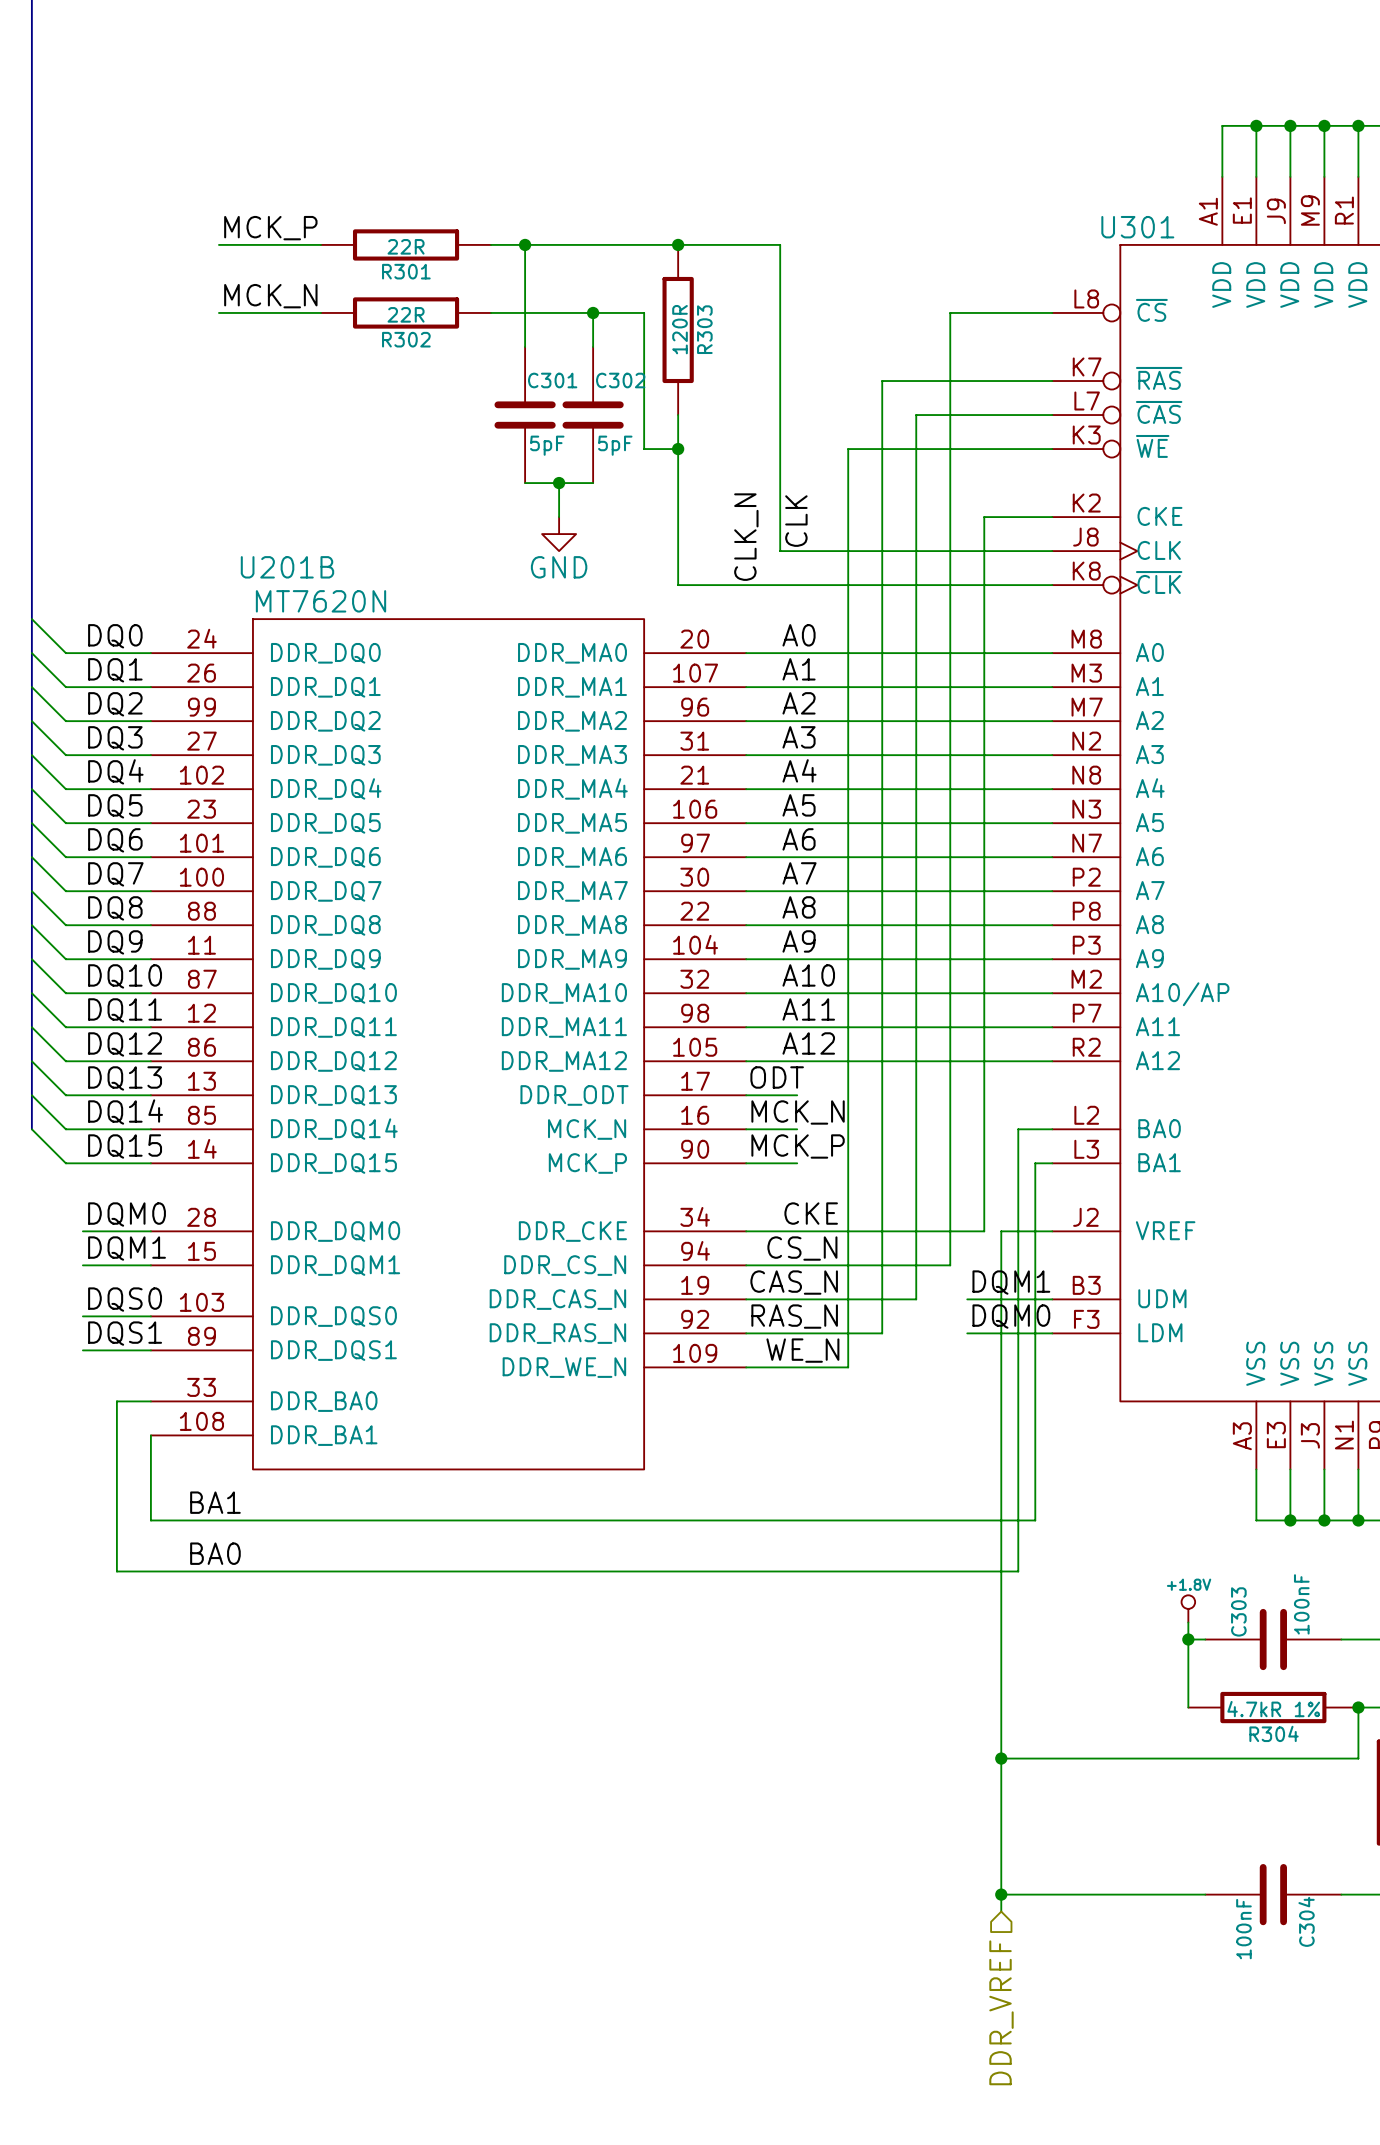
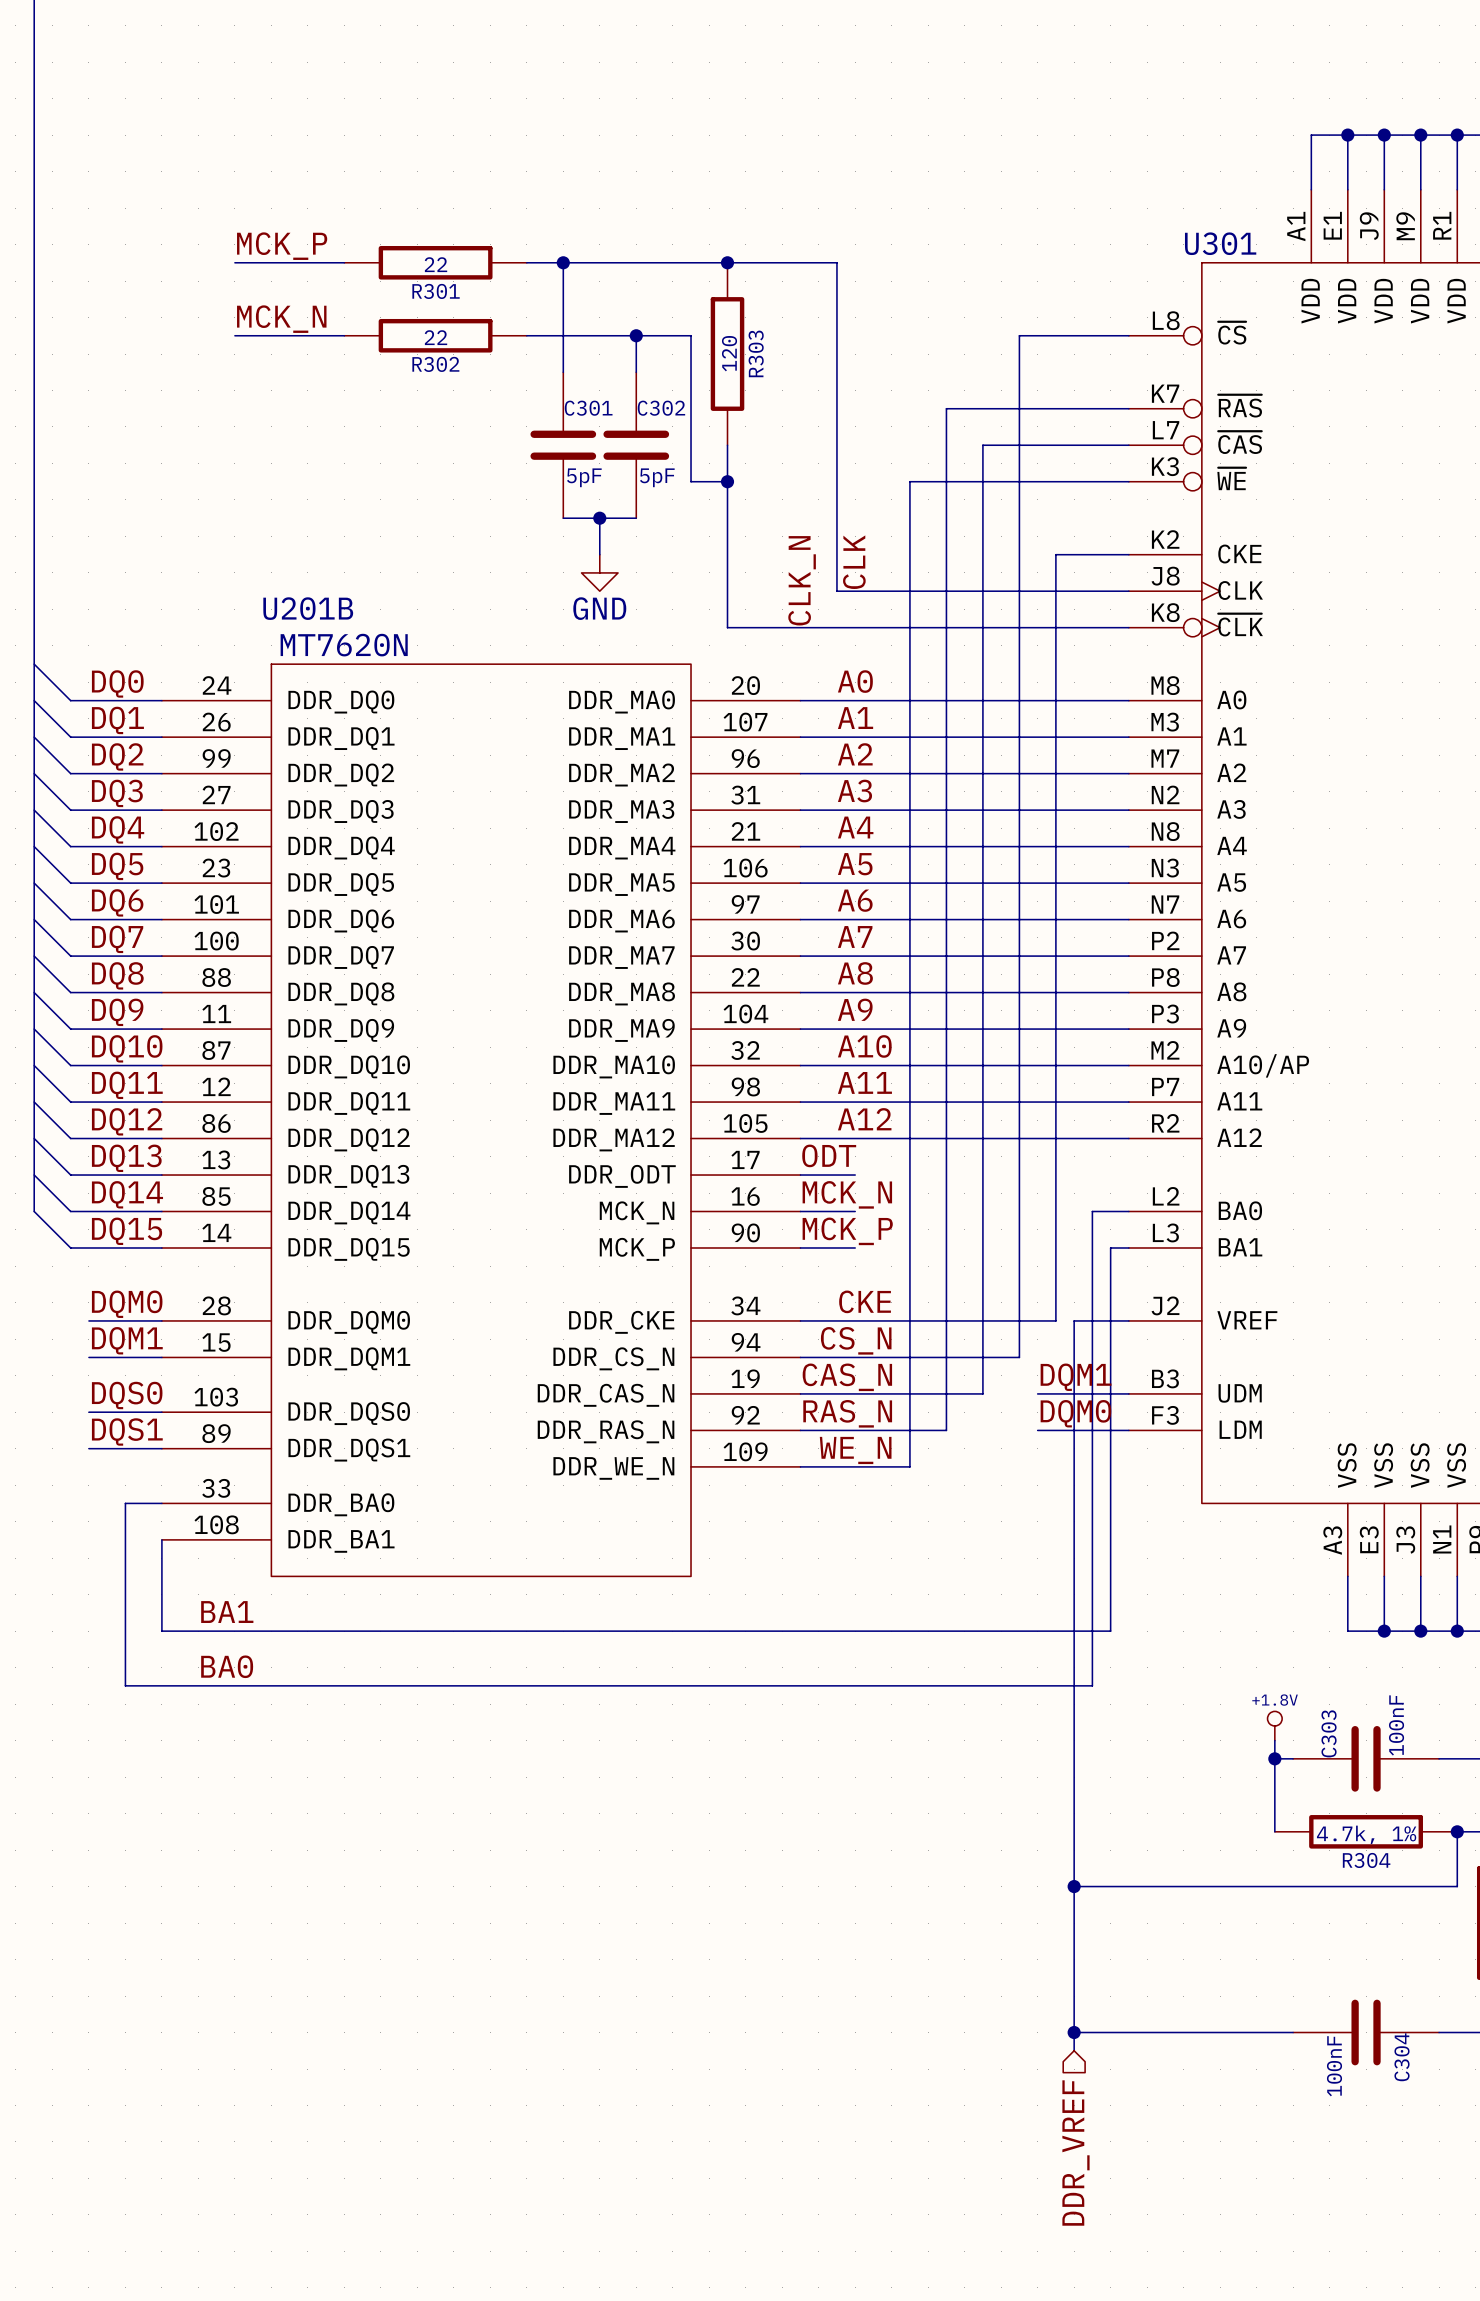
R301 value: 22R (406, 246) -> 22 (435, 264)
R302 value: 22R (406, 314) -> 22 (435, 337)
R303 value: 120R (680, 329) -> 120 (729, 353)
R304 value: 4.7kR 1% (1273, 1709) -> 4.7k, 1% (1366, 1834)

